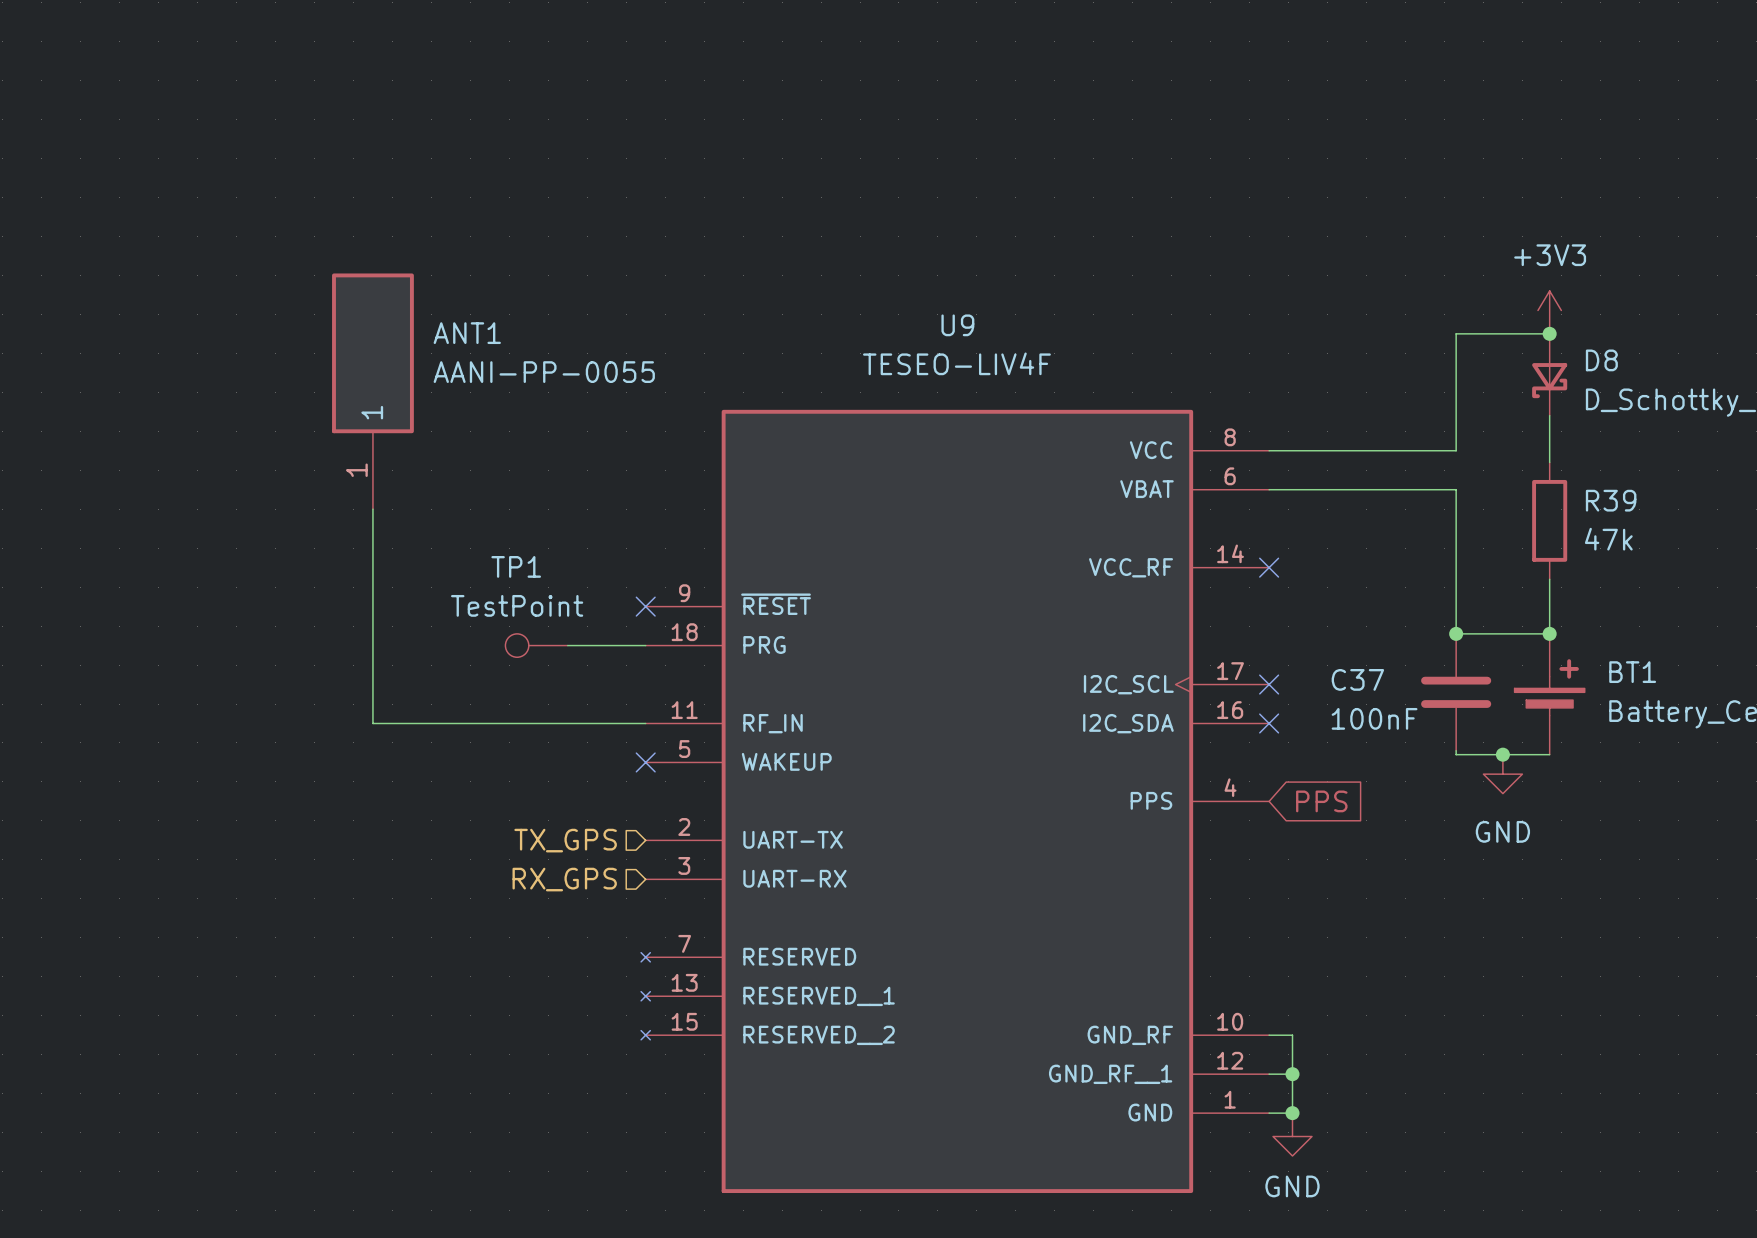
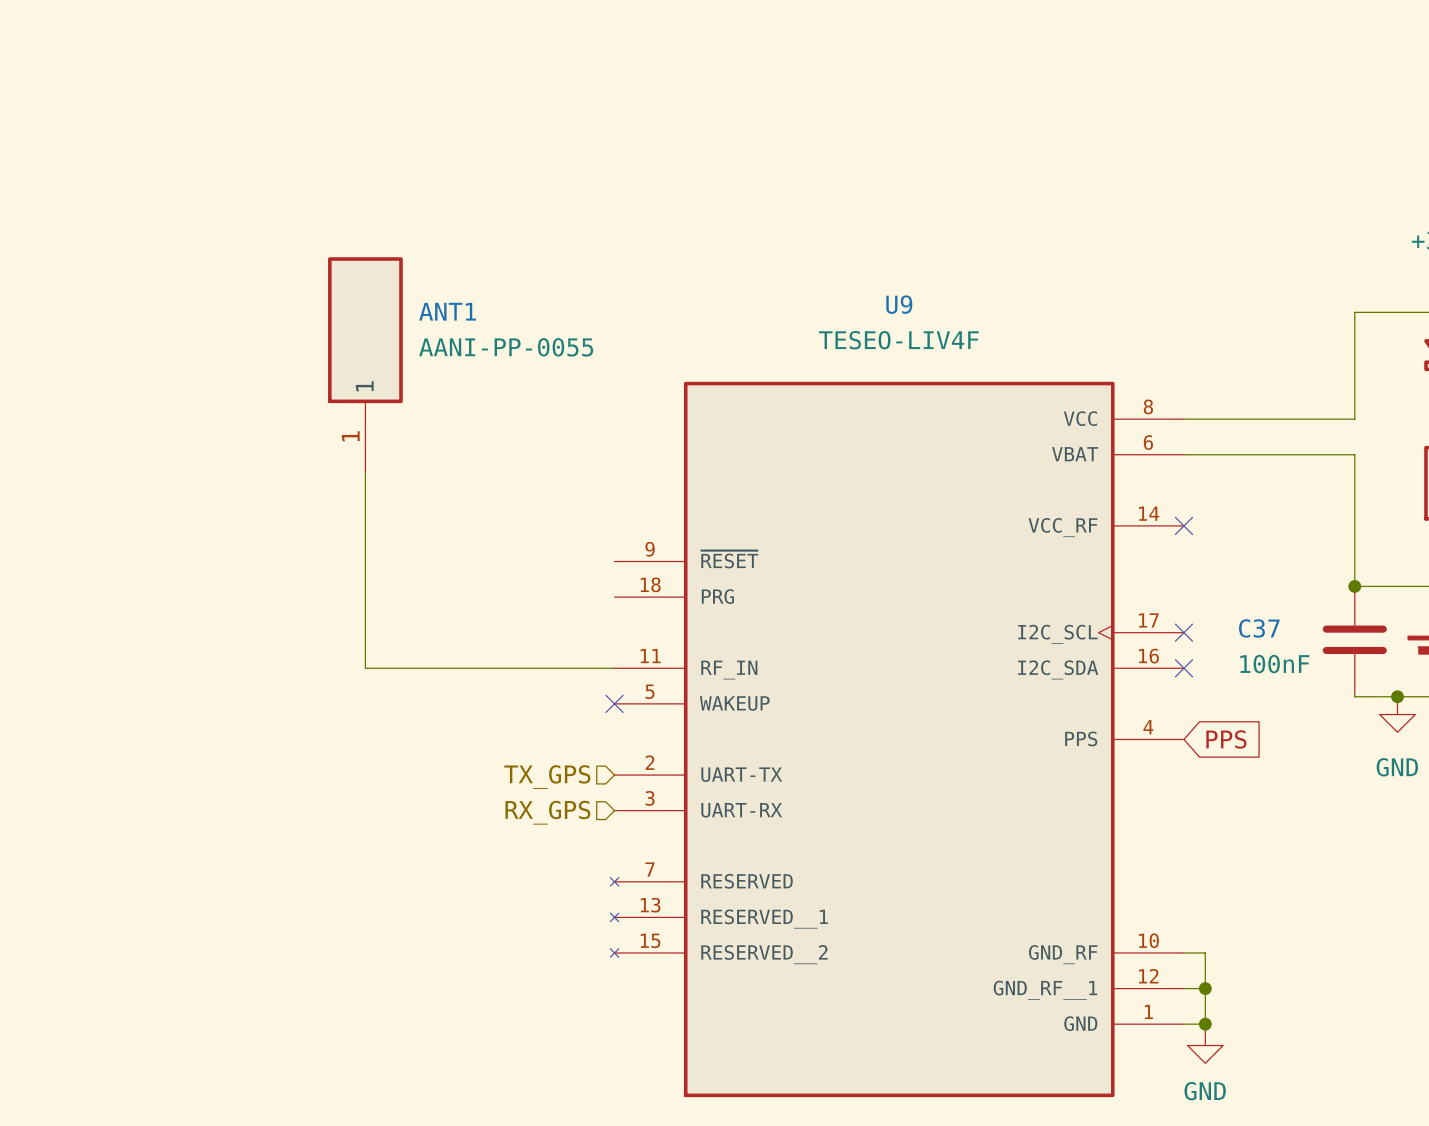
no-connect mark: (645, 606) -> none
TP1: TestPoint (536, 645) -> none
wire: (567, 645) (645, 645) -> none

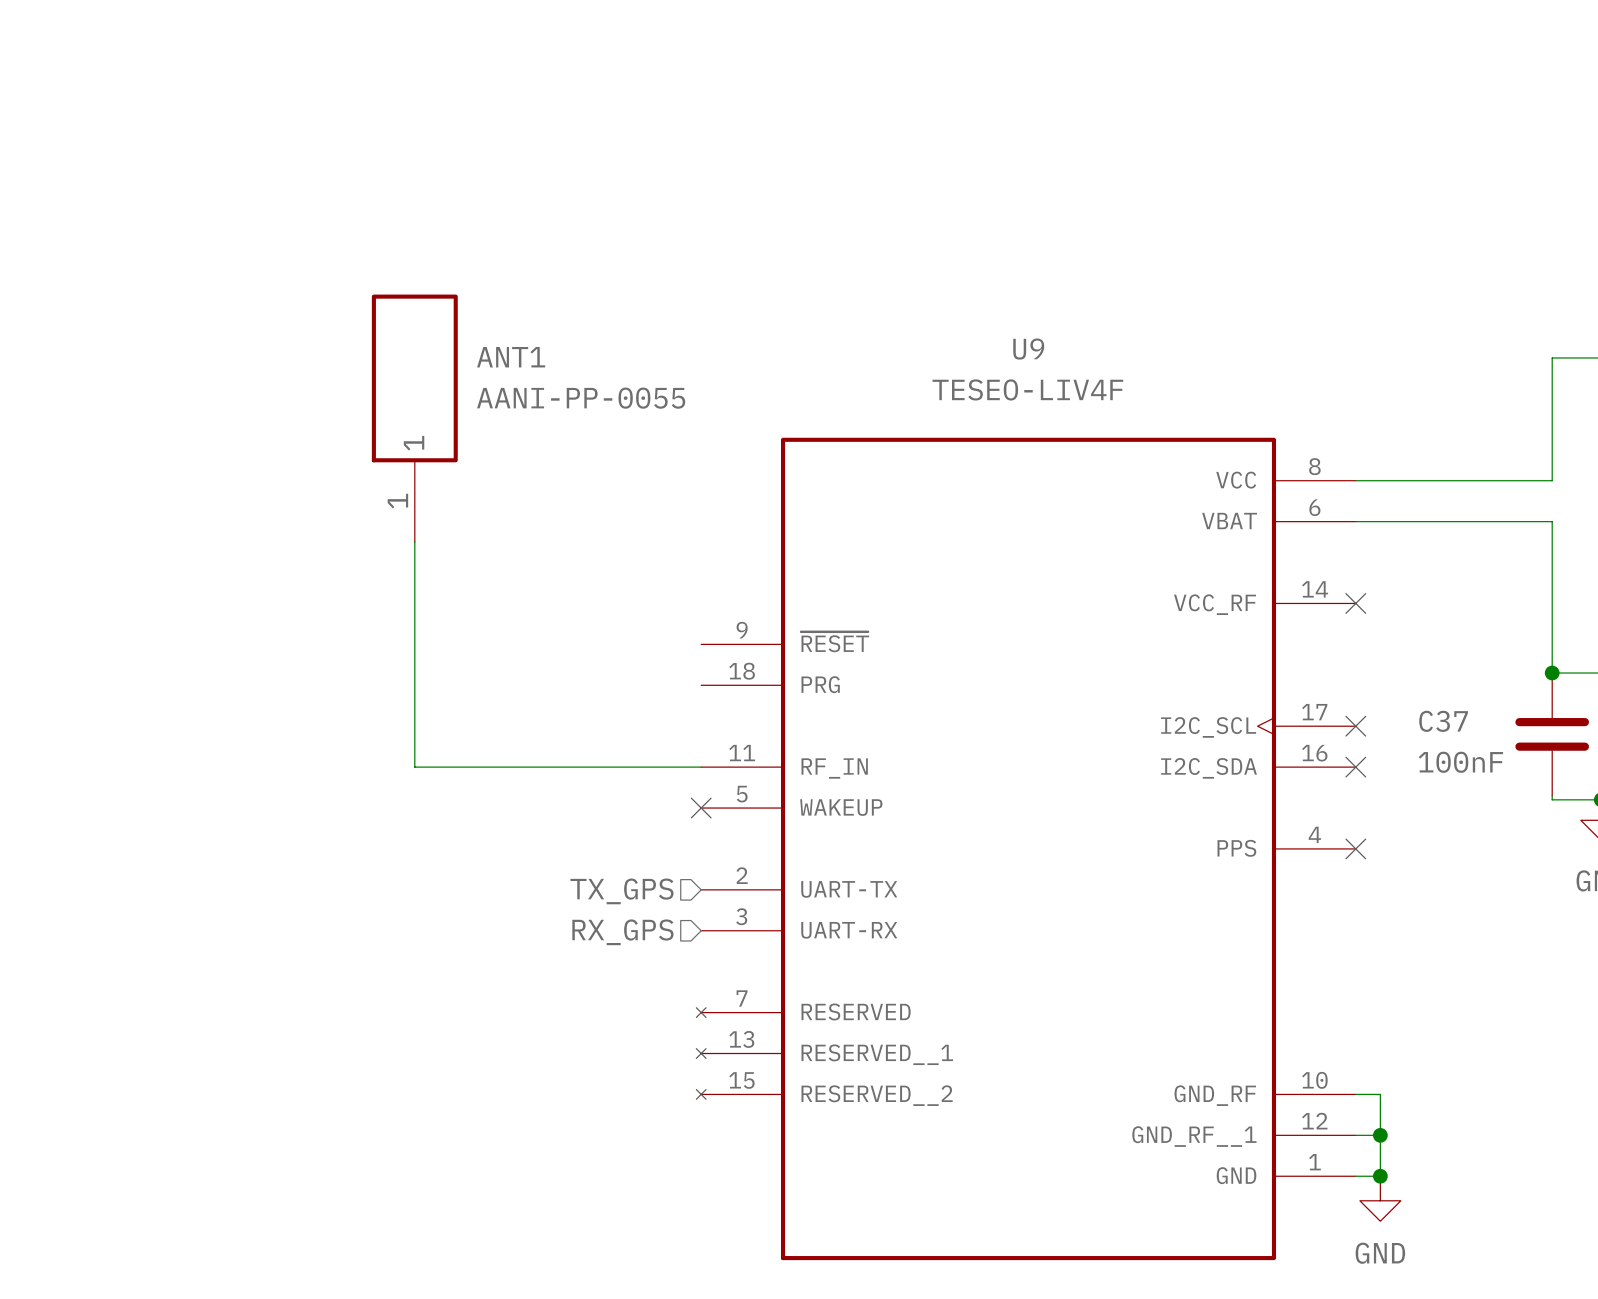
no-connect mark: none -> (1355, 848)
global label: PPS (1226, 739) -> none

